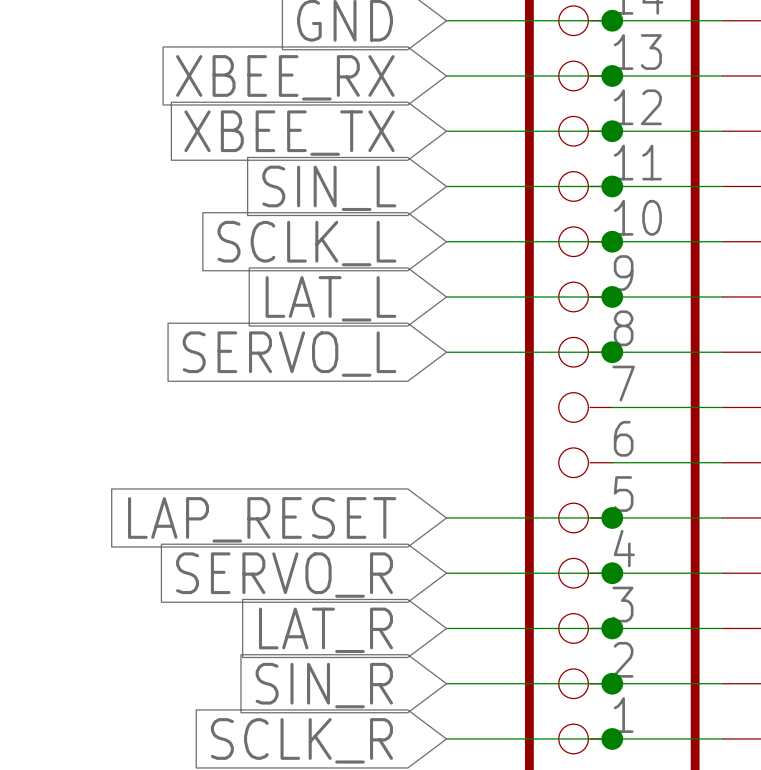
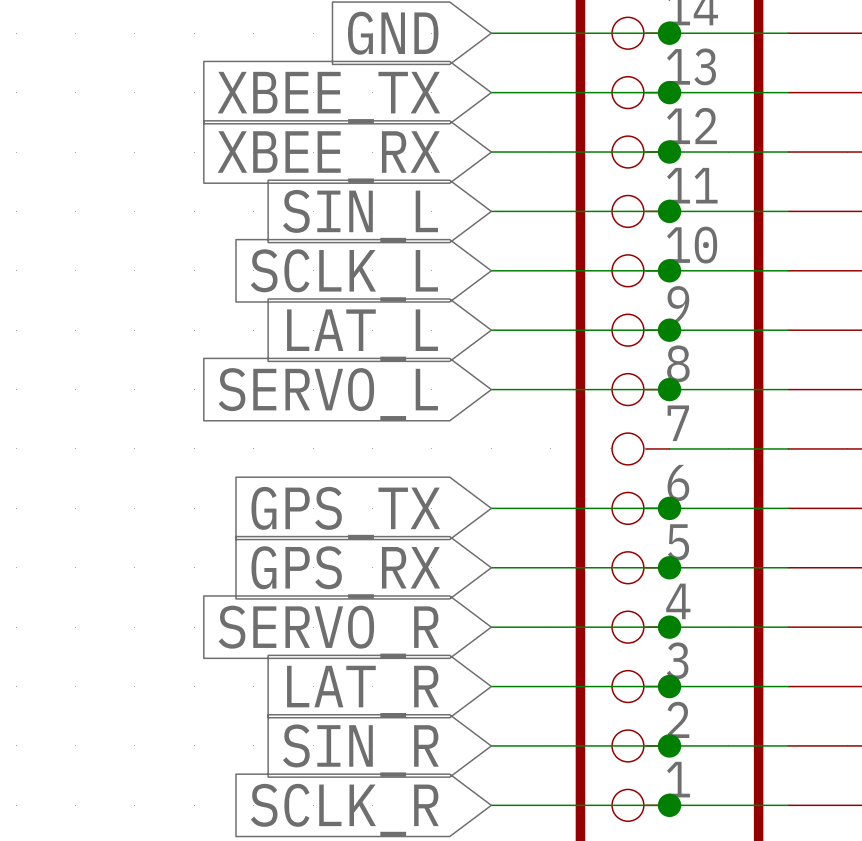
global label: XBEE_RX (285, 77) -> XBEE_TX (328, 97)
global label: XBEE_TX (289, 133) -> XBEE_RX (328, 157)
wire: none -> (491, 508) (669, 508)
junction: none -> (669, 508)
global label: none -> GPS_TX (345, 513)
global label: LAP_RESET (262, 519) -> GPS_RX (345, 572)

